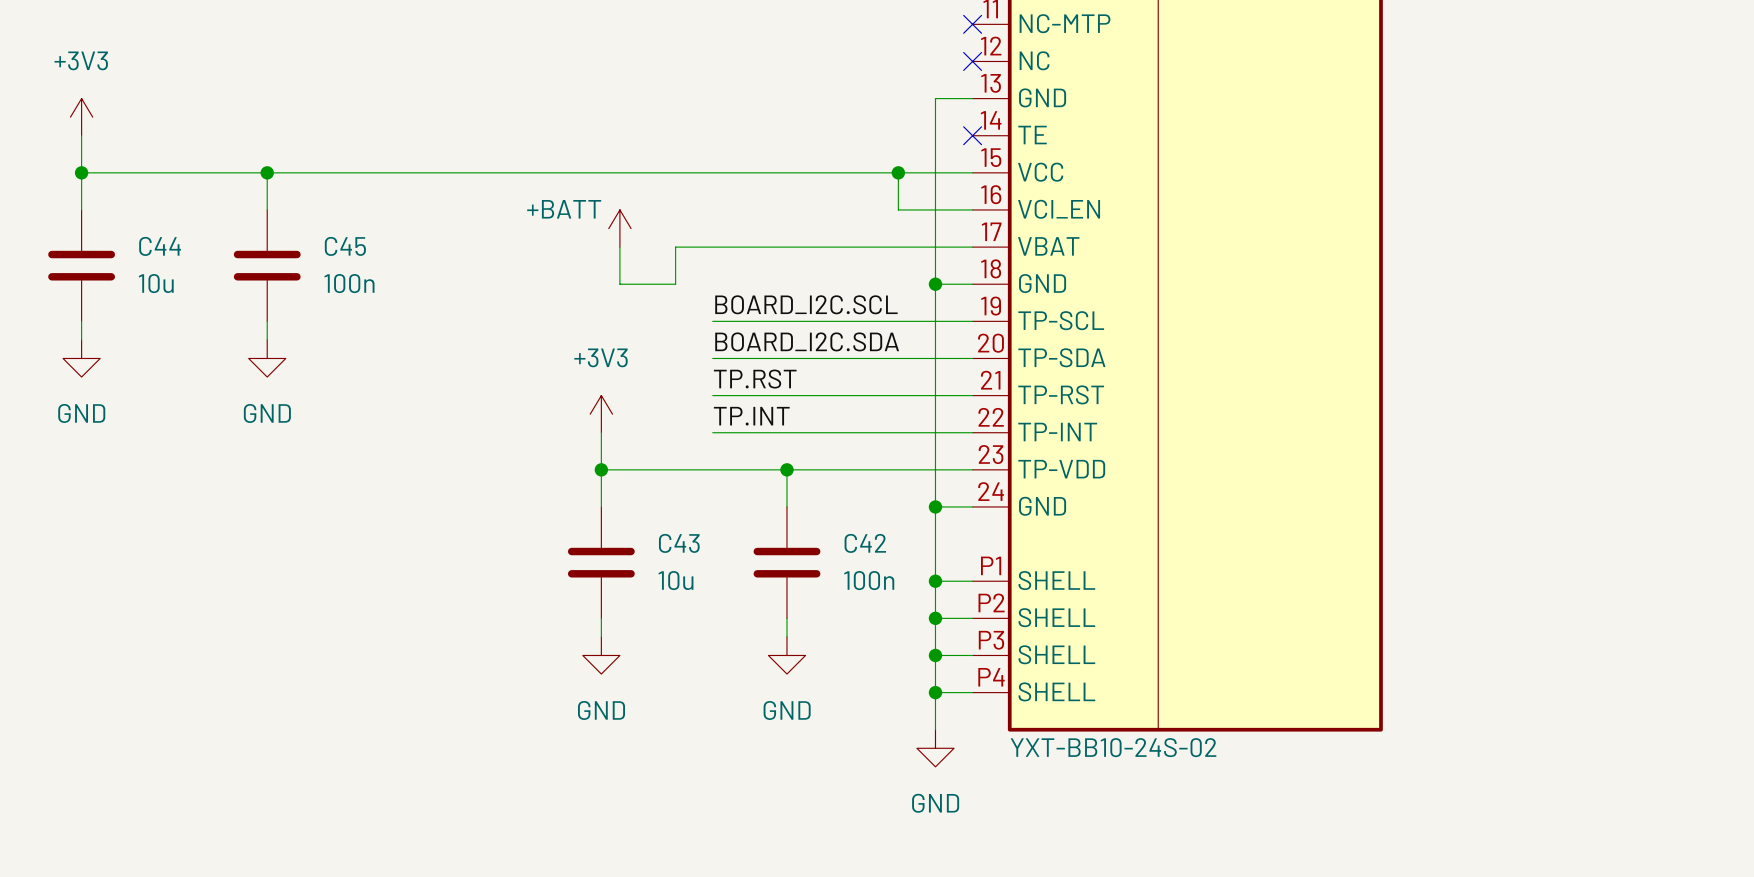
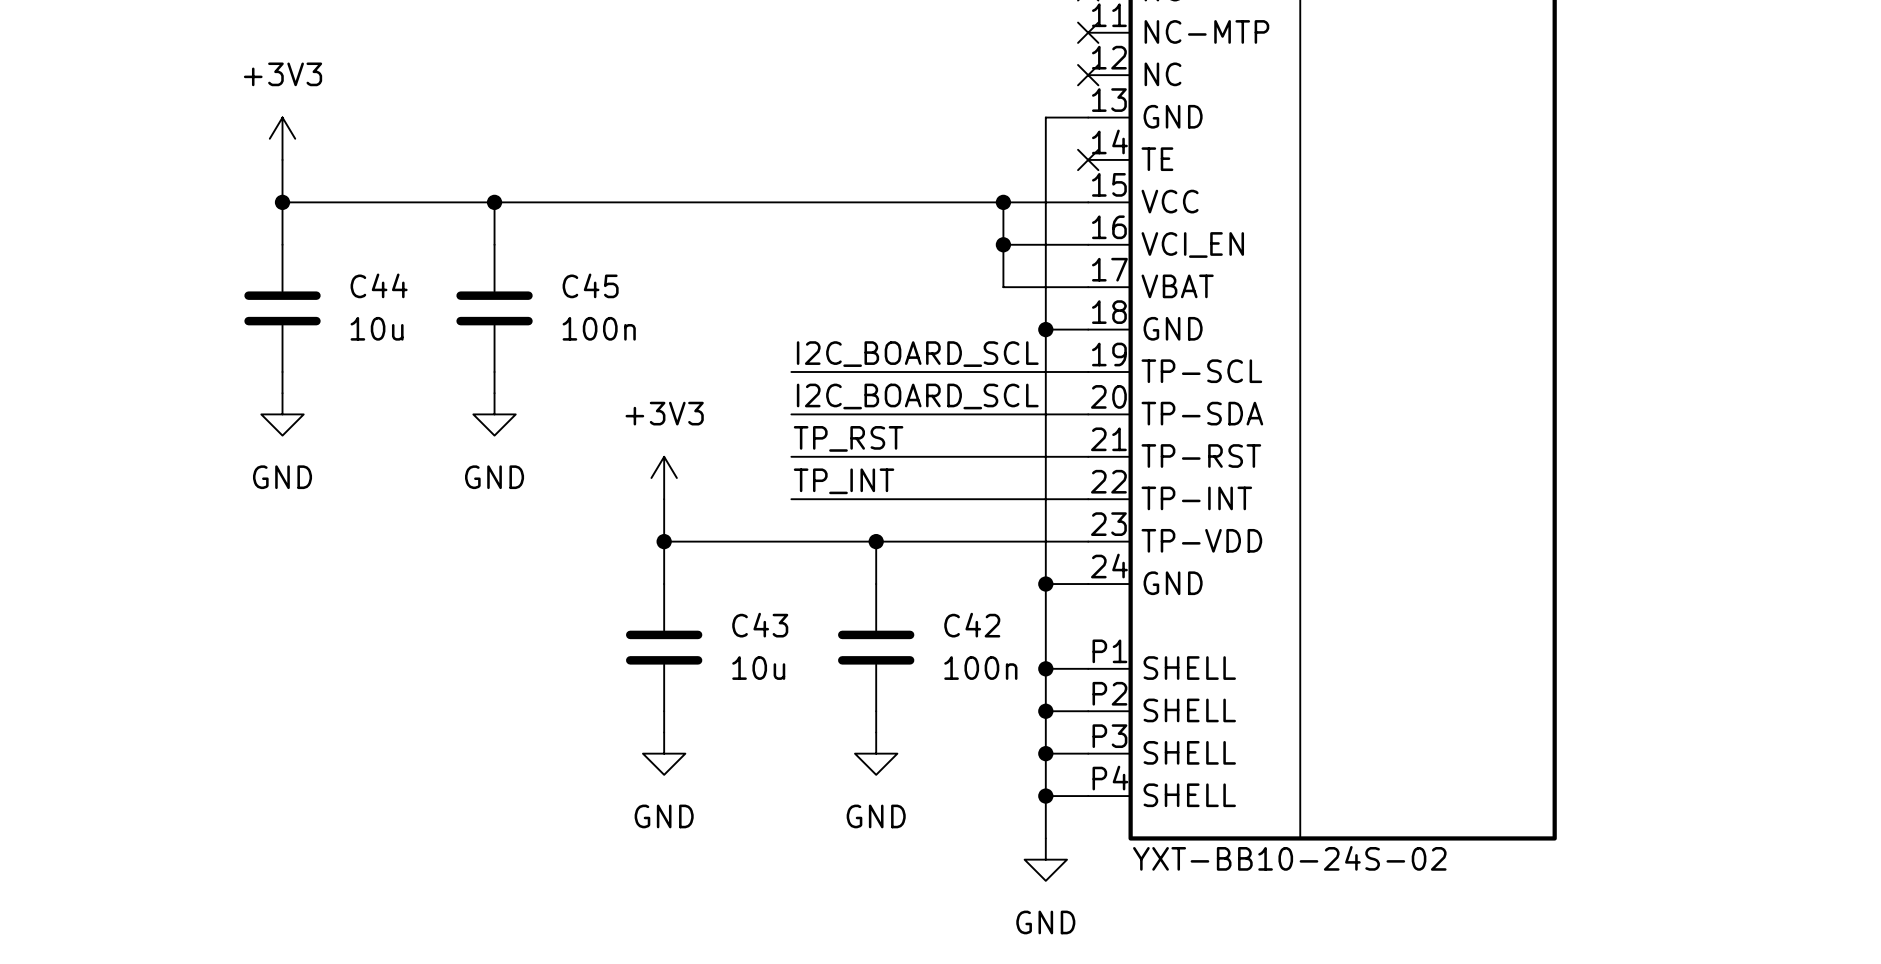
power symbol position: +3V3 (81, 117) -> +3V3 (282, 138)
wire: (81, 135) (81, 209) -> none
wire: (81, 172) (267, 172) -> (282, 159) (282, 202)
junction: (81, 172) -> none
wire: none -> (494, 202) (494, 244)
junction: none -> (494, 202)
junction: none -> (1003, 244)
power symbol: +BATT (619, 228) -> none
C45 name: C45 (345, 246) -> C44 (379, 285)
wire: (619, 247) (619, 284) (675, 284) (675, 247) (898, 247) -> (1003, 244) (1003, 287)
C44: 10u (81, 265) -> none
C45: none -> 100n (494, 308)
C45 value: 100n (349, 283) -> 10u (377, 328)
label: BOARD_I2C.SCL (806, 304) -> I2C_BOARD_SCL (917, 354)
wire: (81, 321) (81, 339) -> none
wire: none -> (494, 371) (494, 393)
label: BOARD_I2C.SDA (807, 341) -> I2C_BOARD_SCL (917, 396)
power symbol: GND (81, 358) -> none
power symbol: none -> GND (494, 414)
label: TP.RST (755, 379) -> TP_RST (848, 438)
label: TP.INT (751, 416) -> TP_INT (844, 481)

